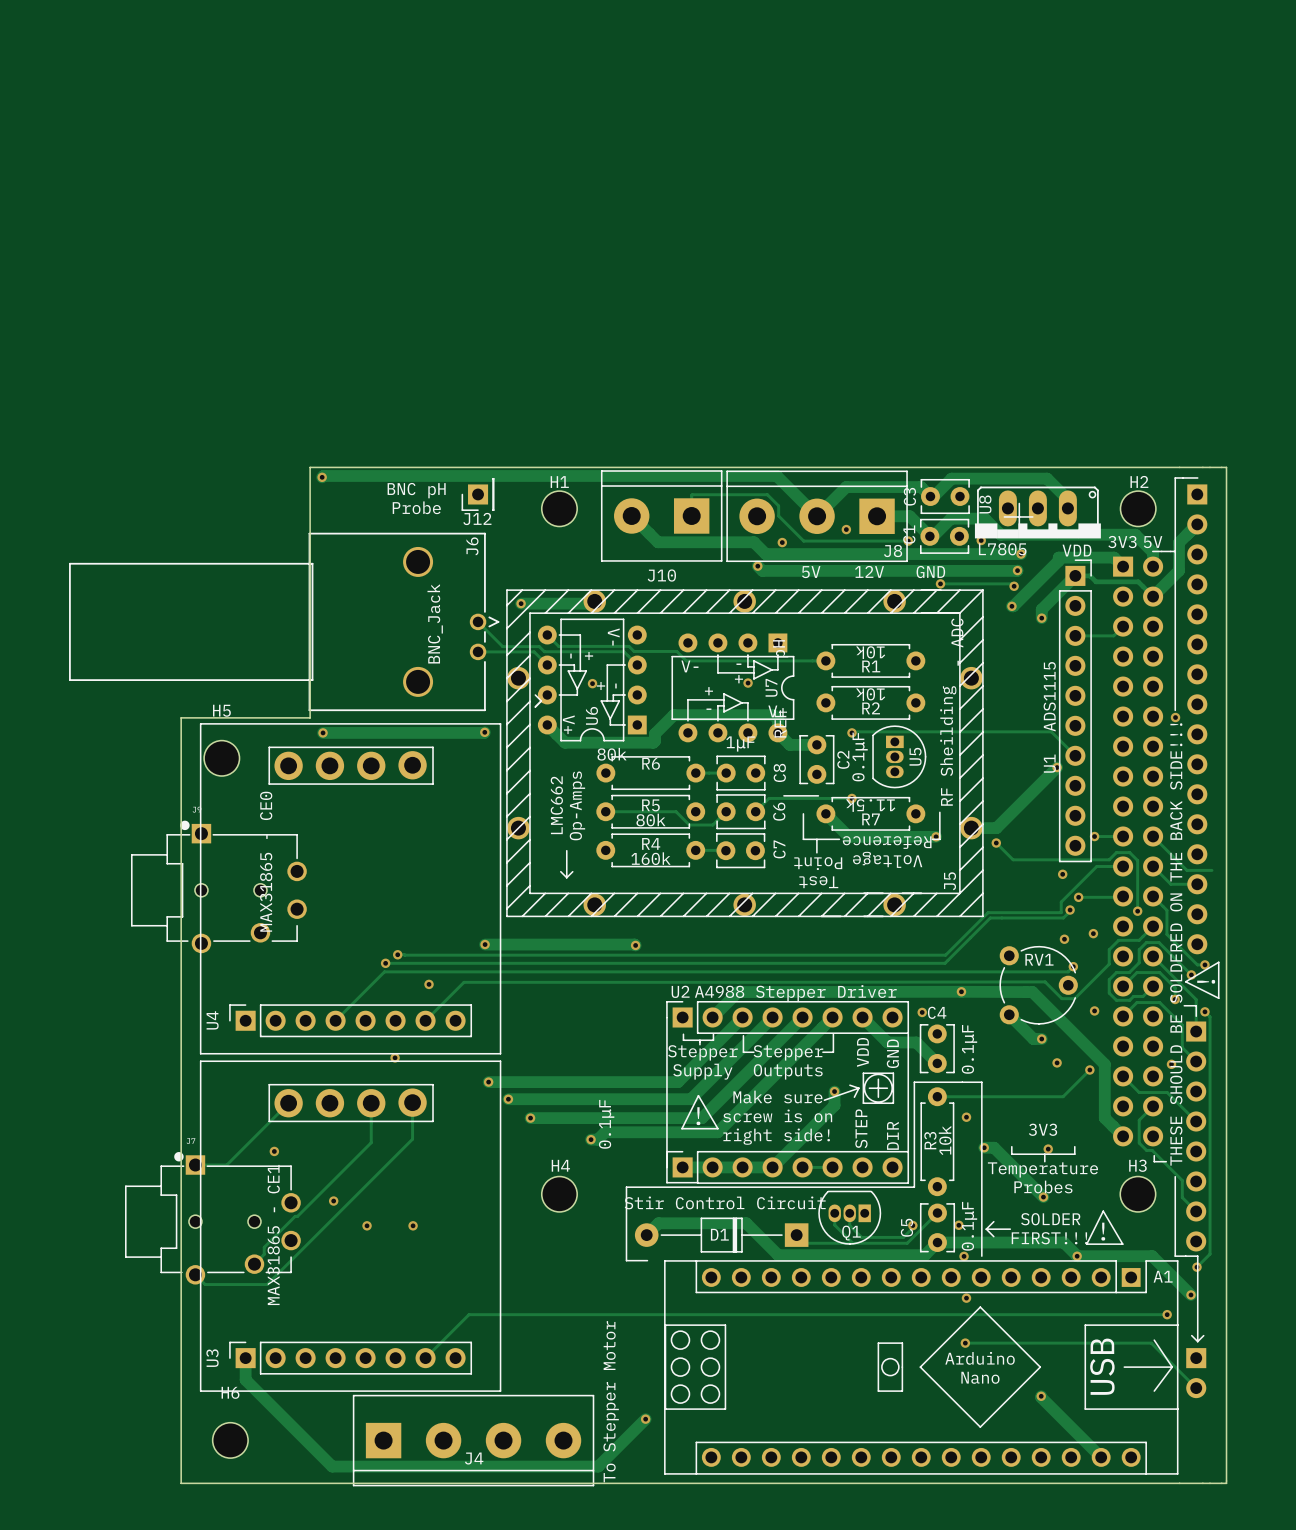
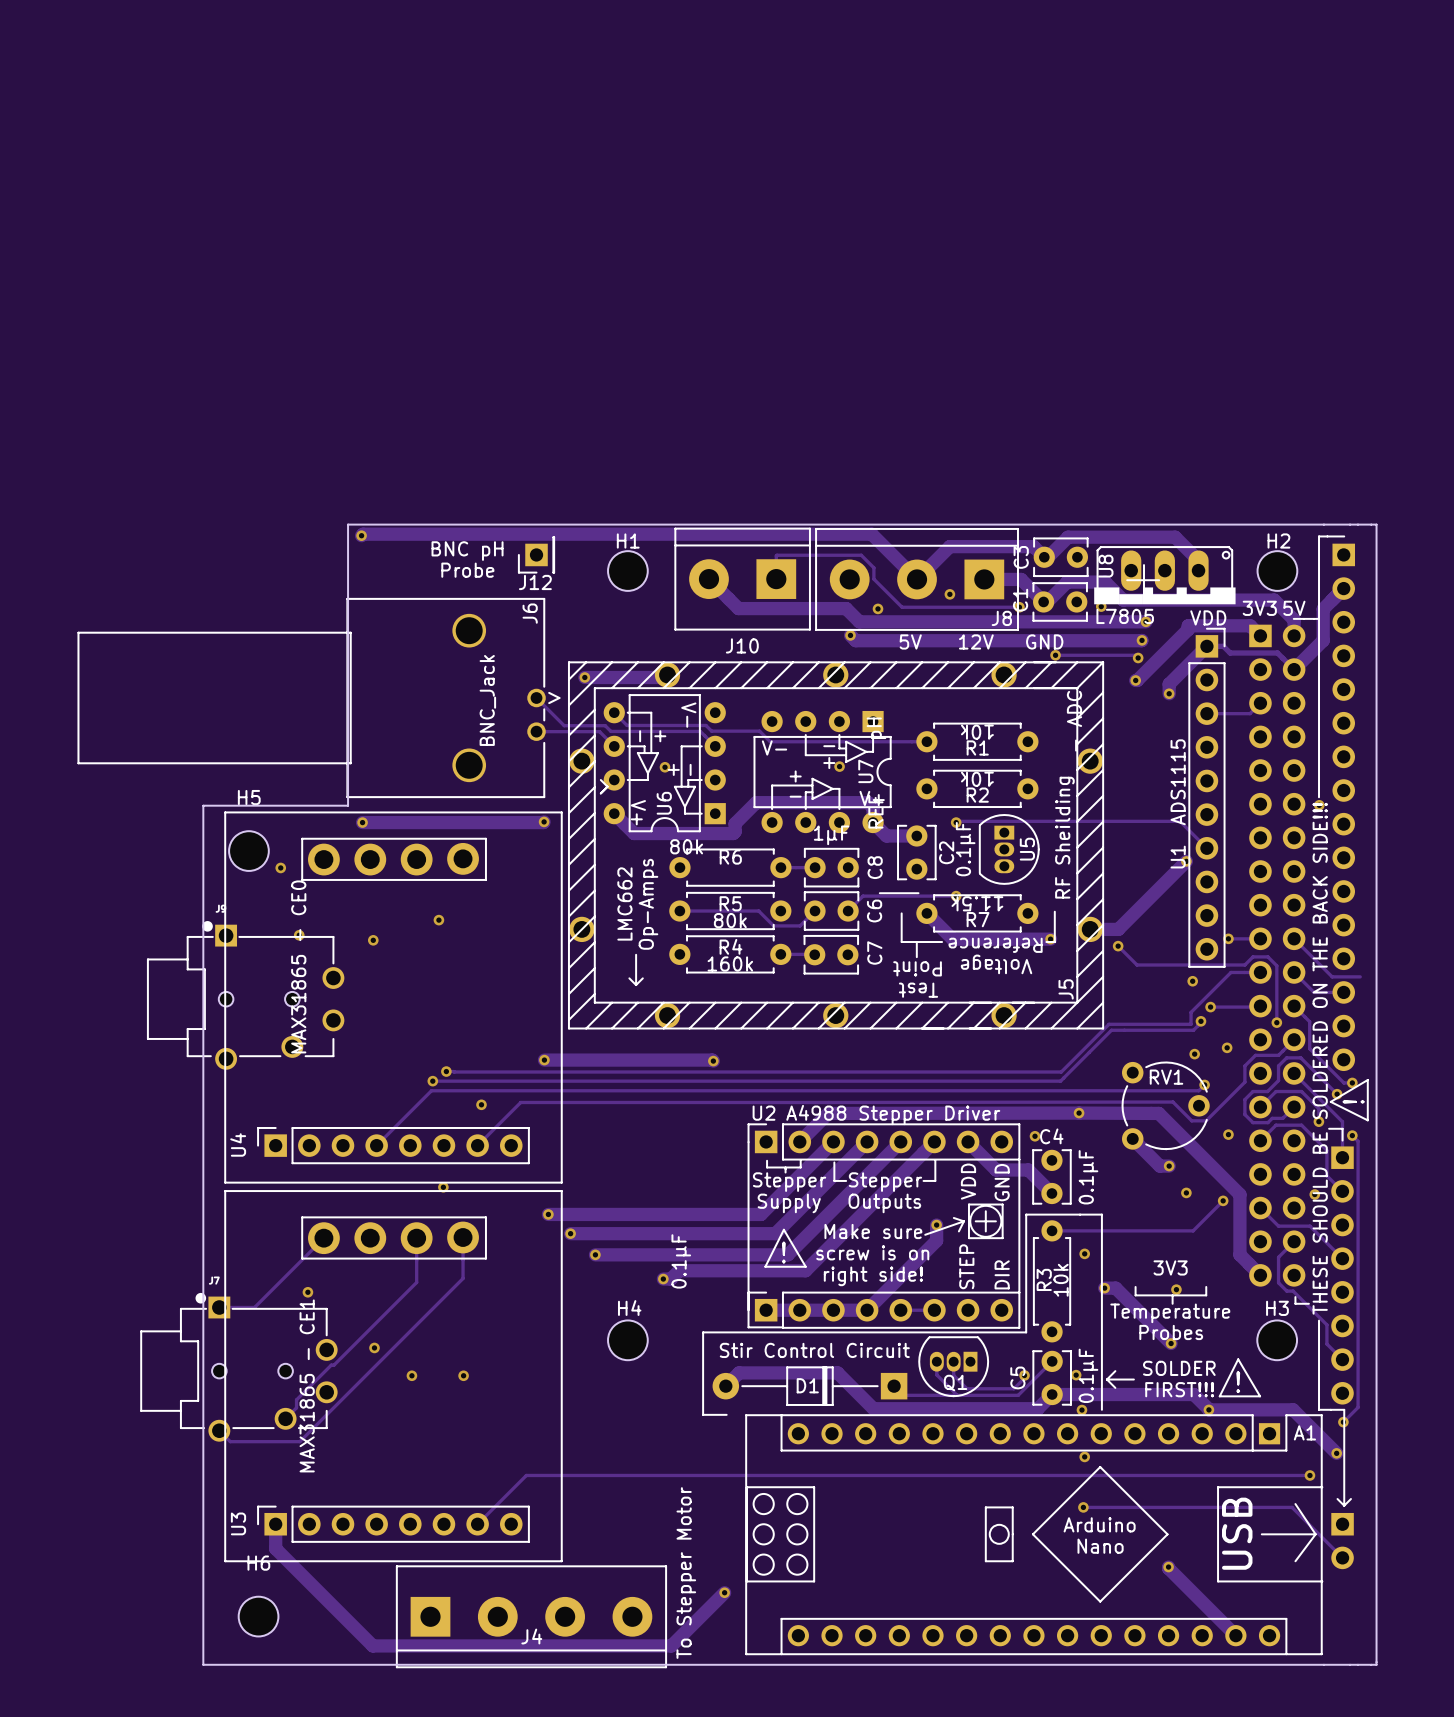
via: none -> (280, 867)
via: none -> (438, 920)
via: none -> (299, 935)
via: none -> (373, 940)

